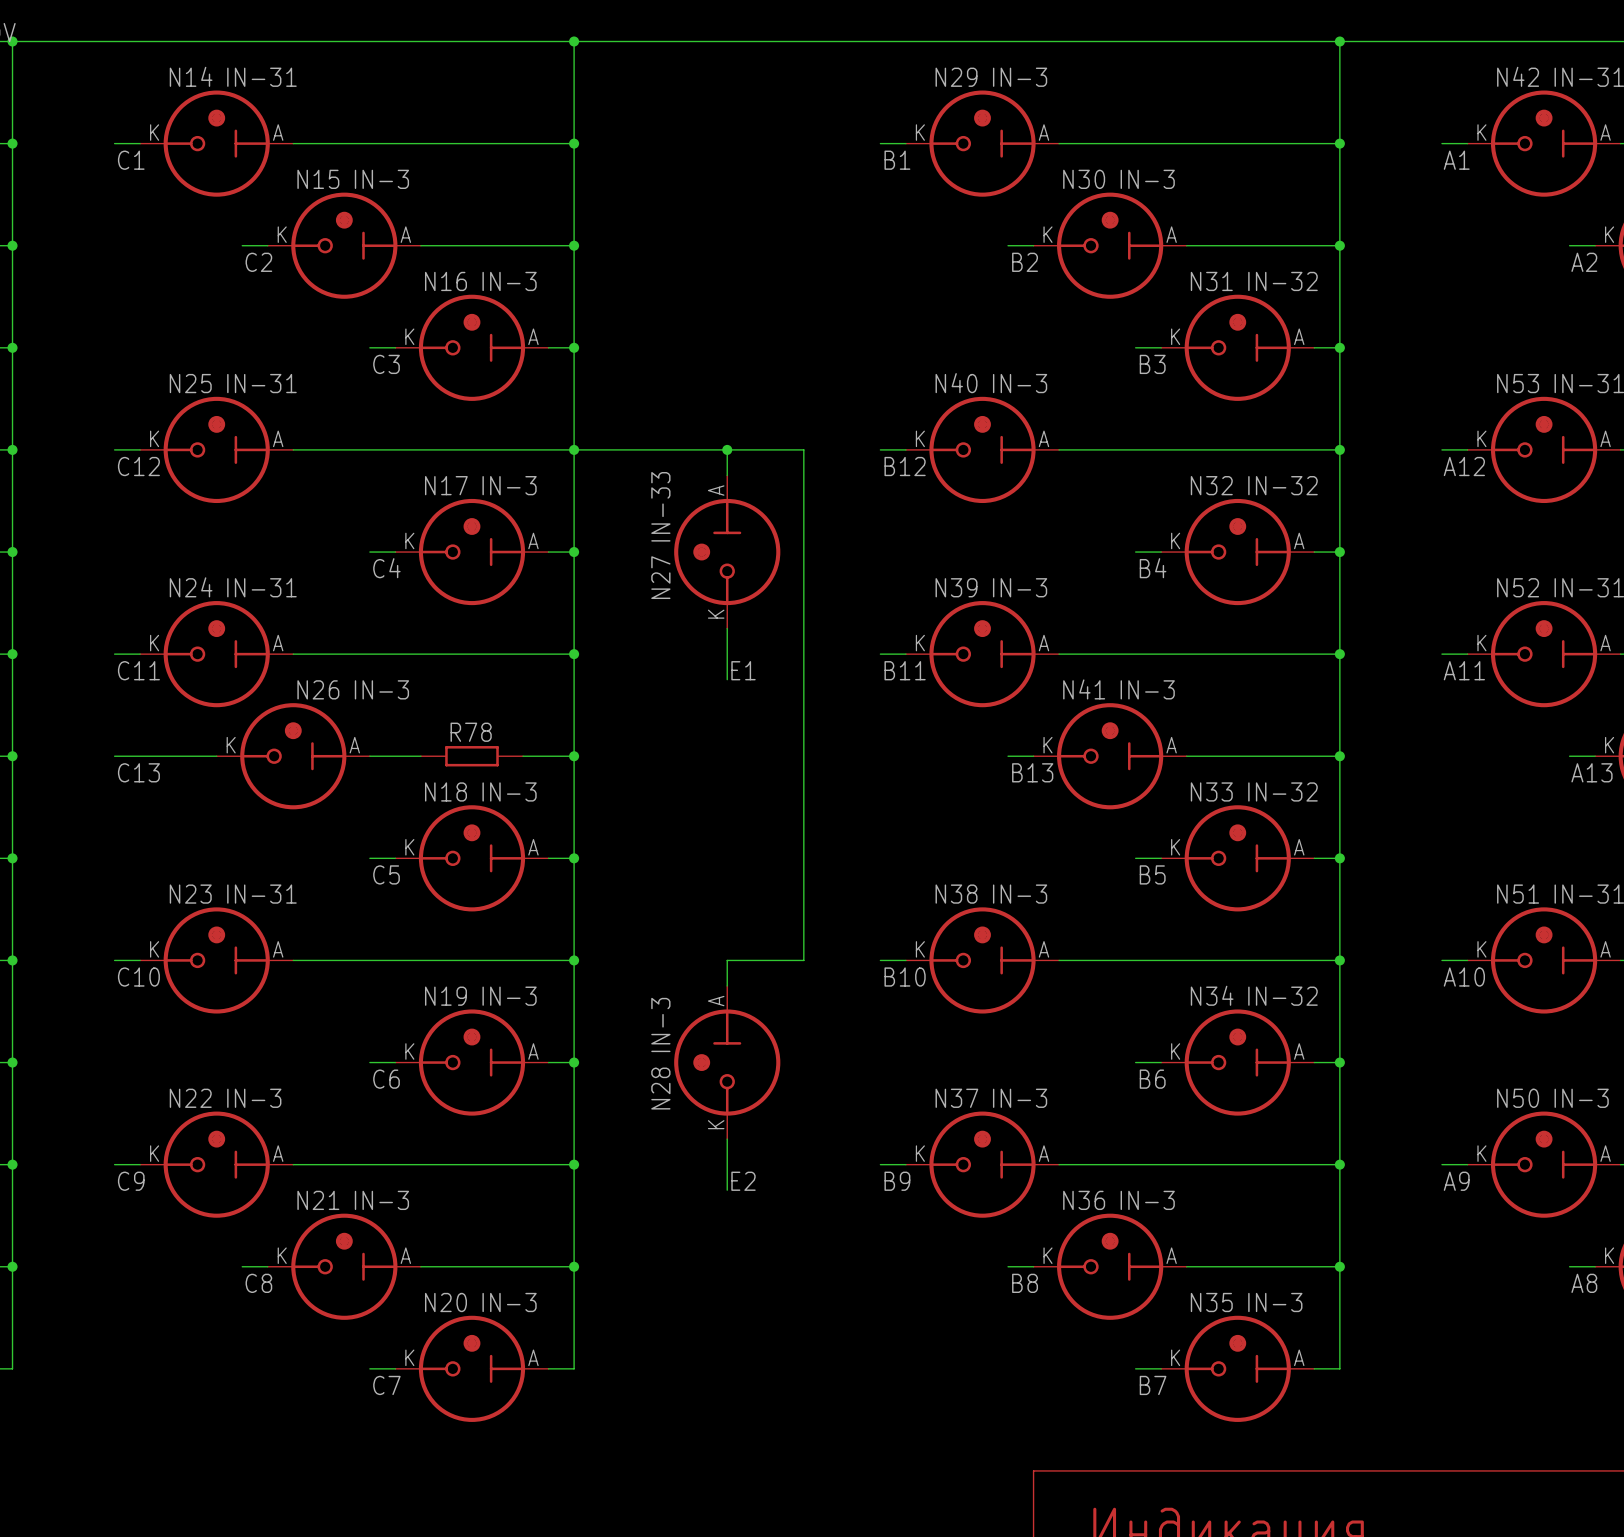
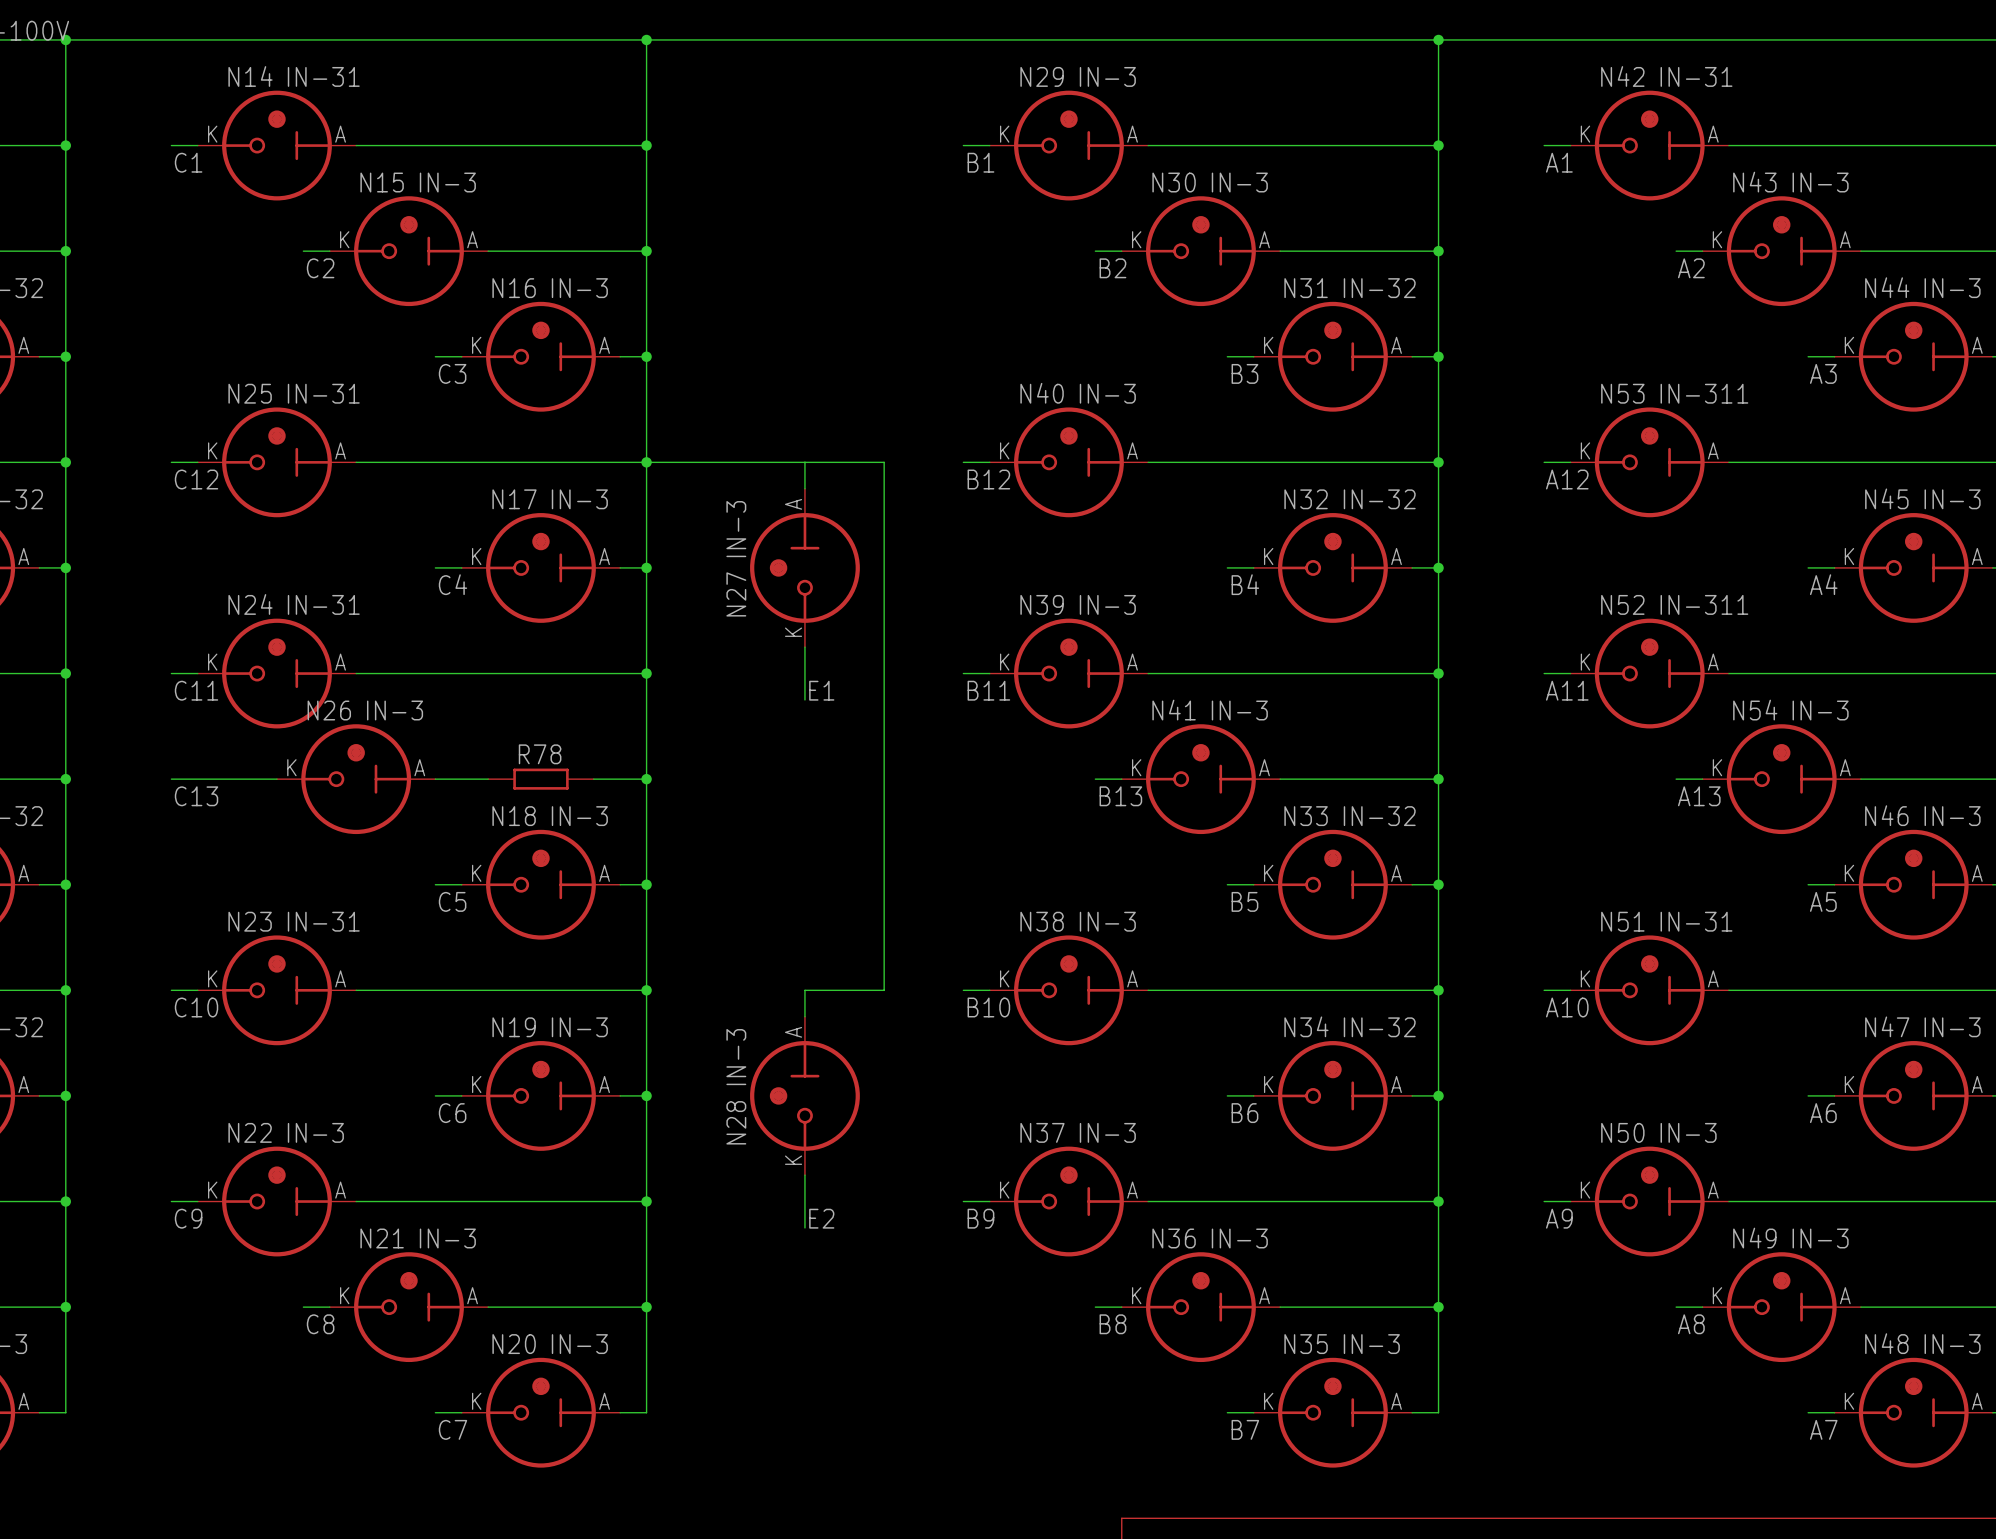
junction: (727, 449) -> none
N27 value: IN-33 (660, 506) -> IN-3 (736, 529)
N26 name position: N26 (318, 689) -> N26 (329, 710)
N26 value position: IN-3 (381, 689) -> IN-3 (395, 710)

